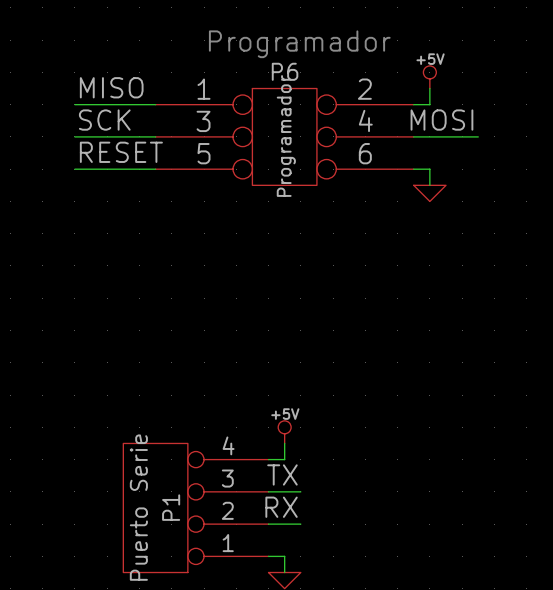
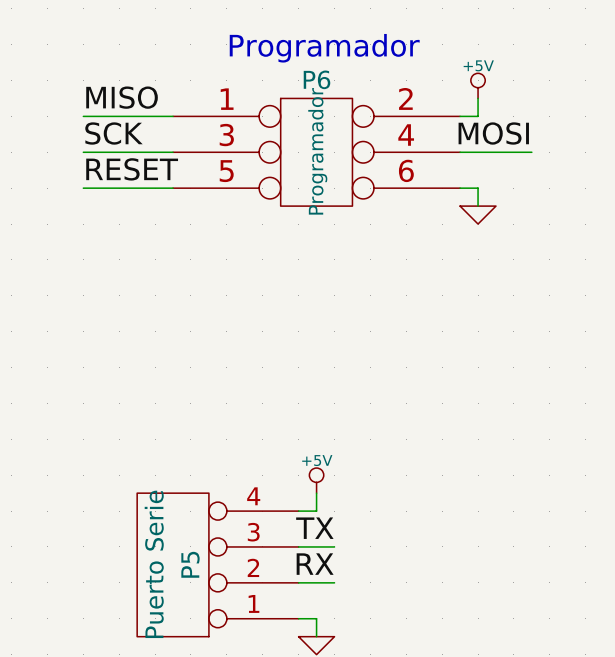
P1 name: P1 (171, 507) -> P5 (190, 564)

